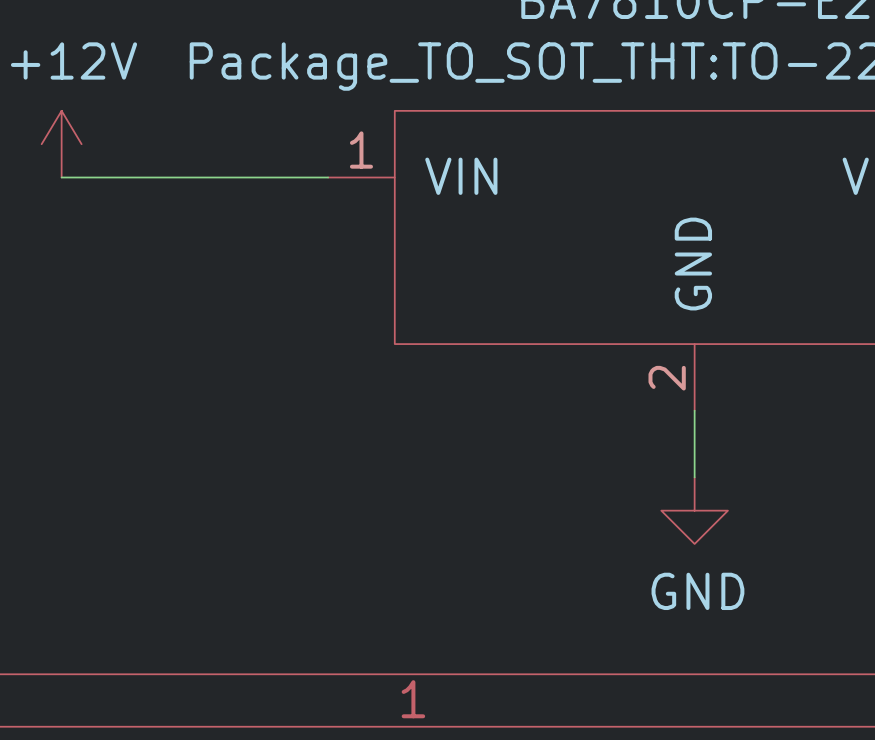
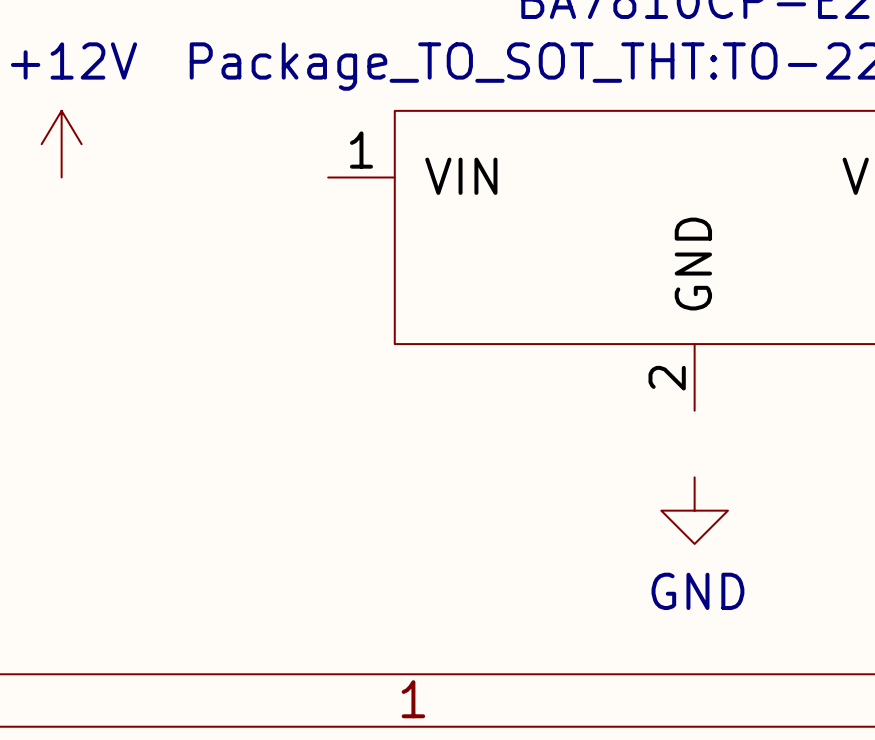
wire: (61, 177) (328, 177) -> none
wire: (694, 410) (694, 477) -> none

